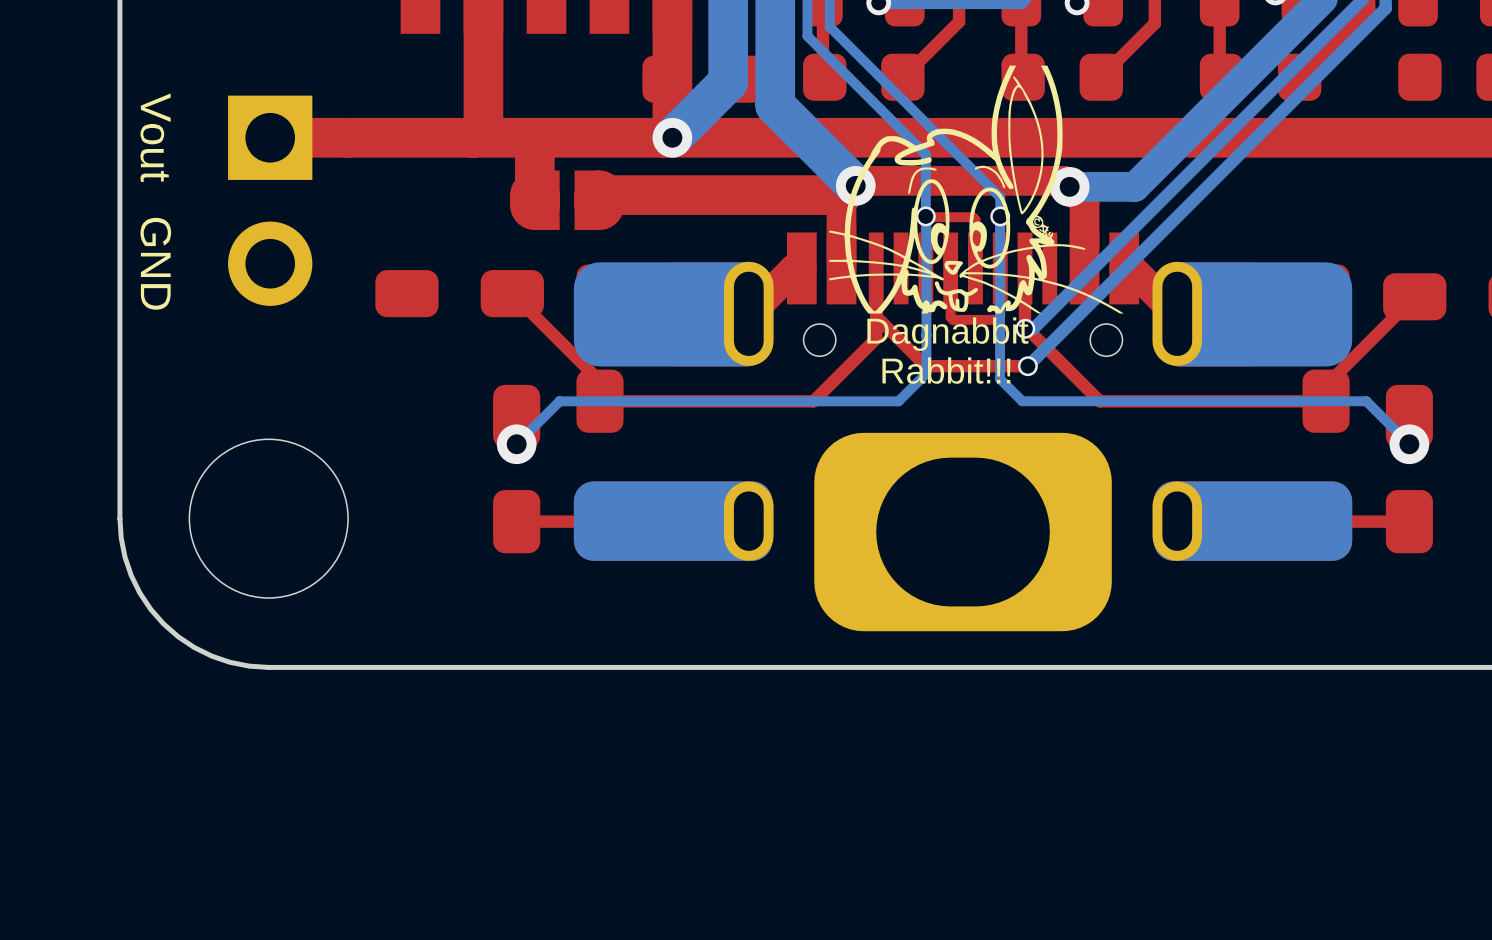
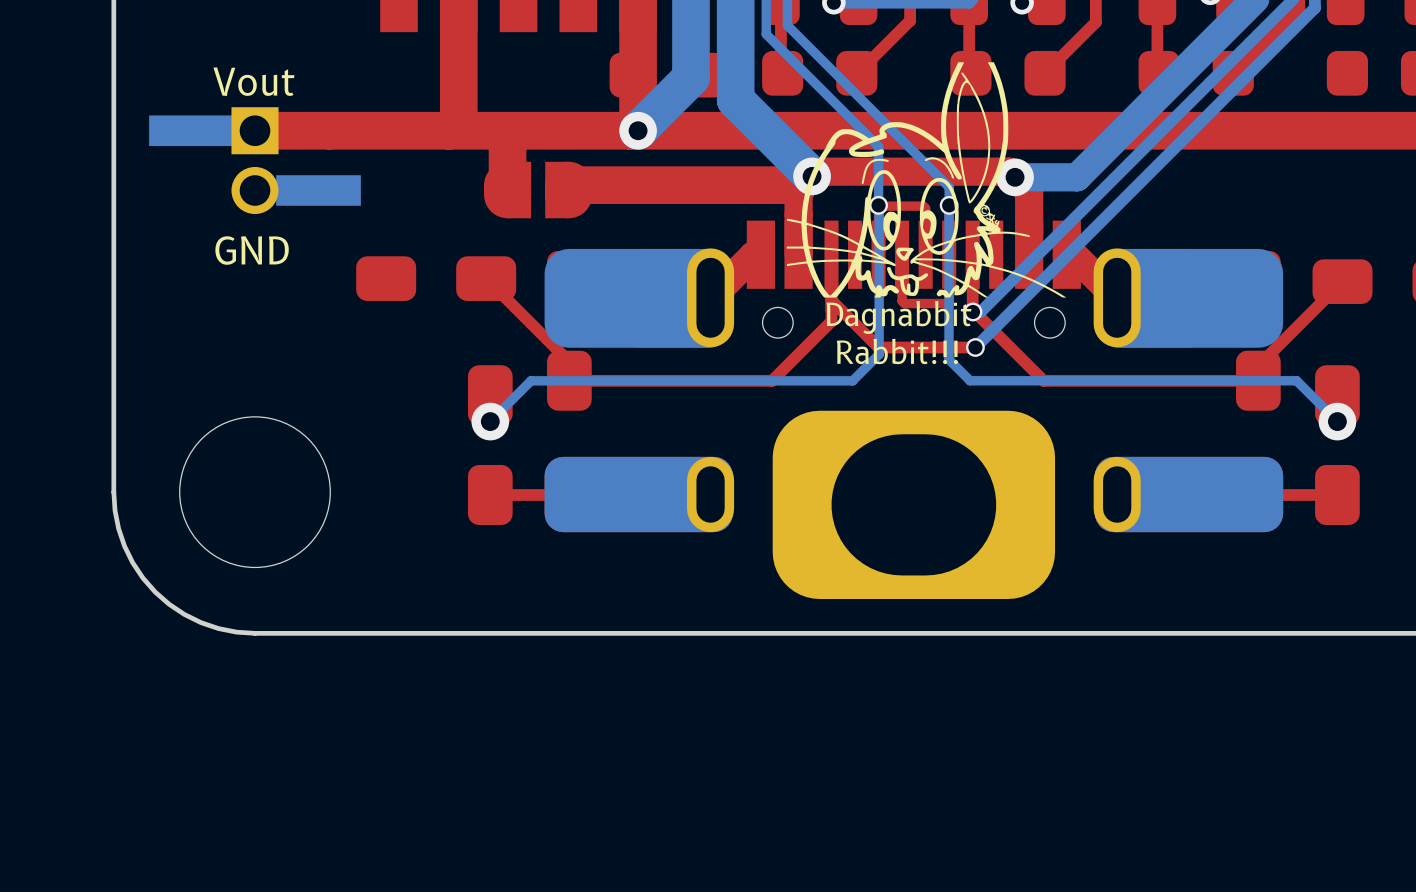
part footprint: [228, 95, 313, 306] -> [149, 107, 361, 215]
text rotation: 0° (155, 137) -> 90° counterclockwise (253, 81)
text rotation: 0° (155, 263) -> 90° counterclockwise (252, 250)

